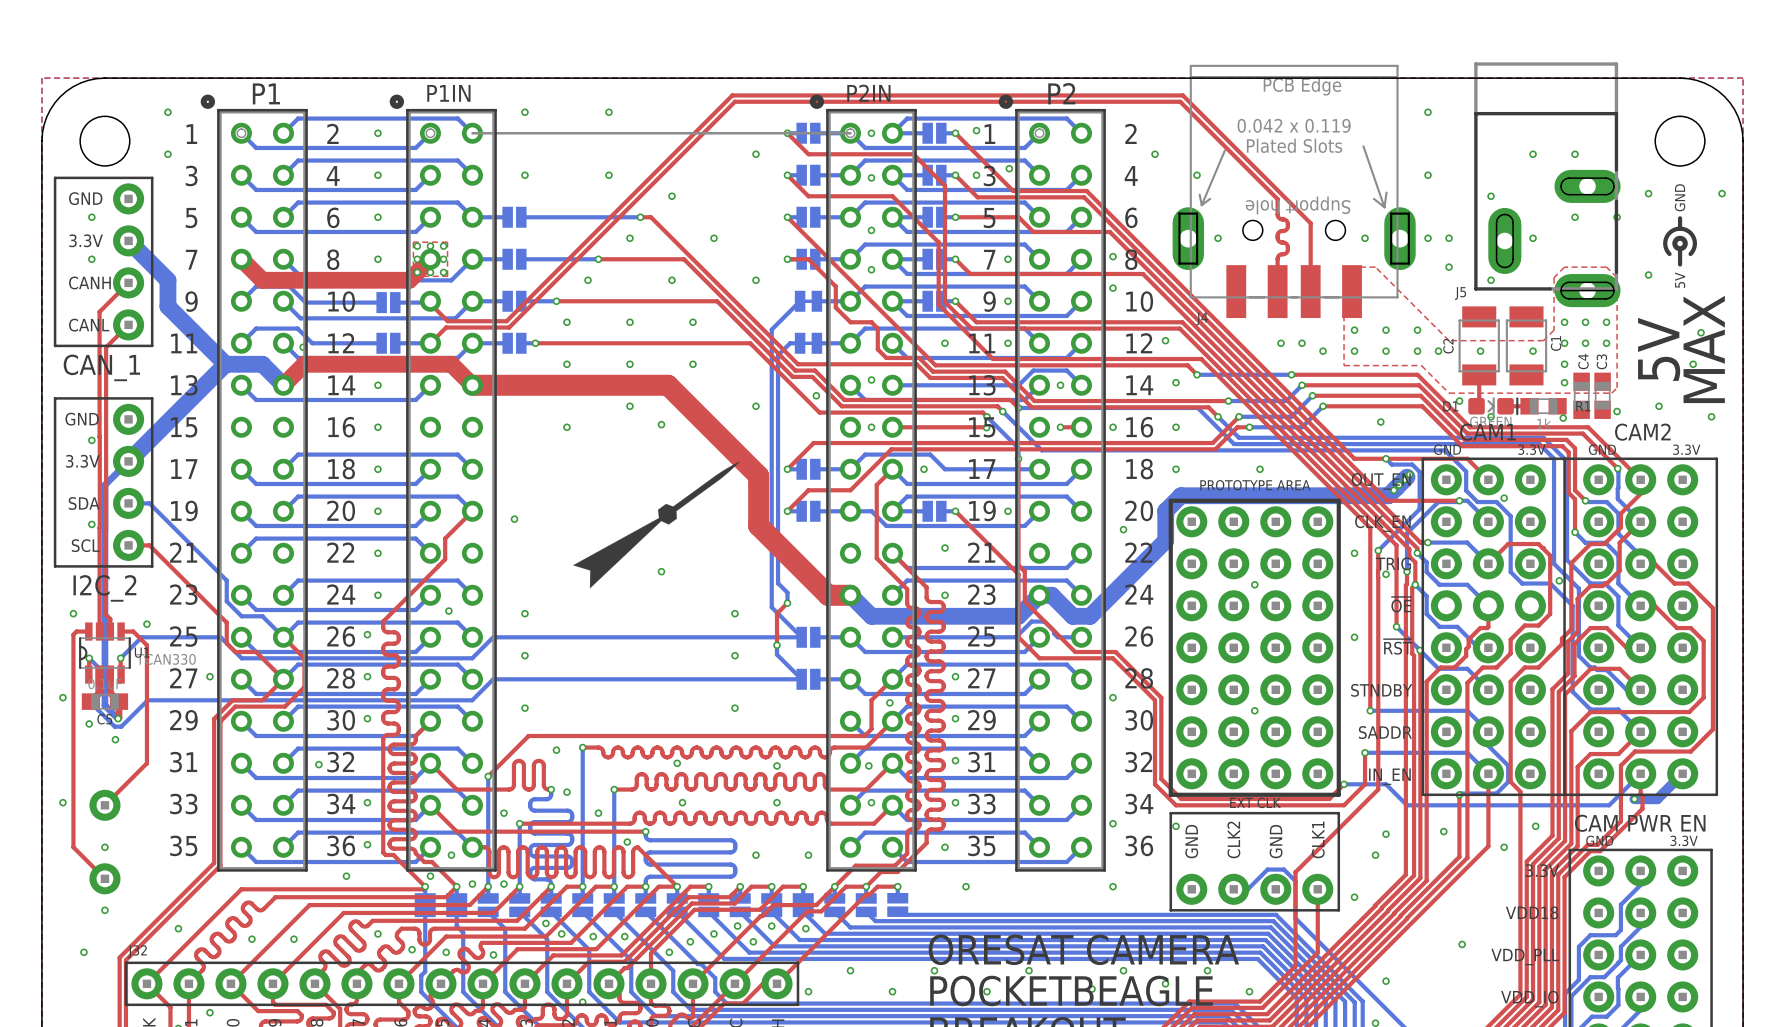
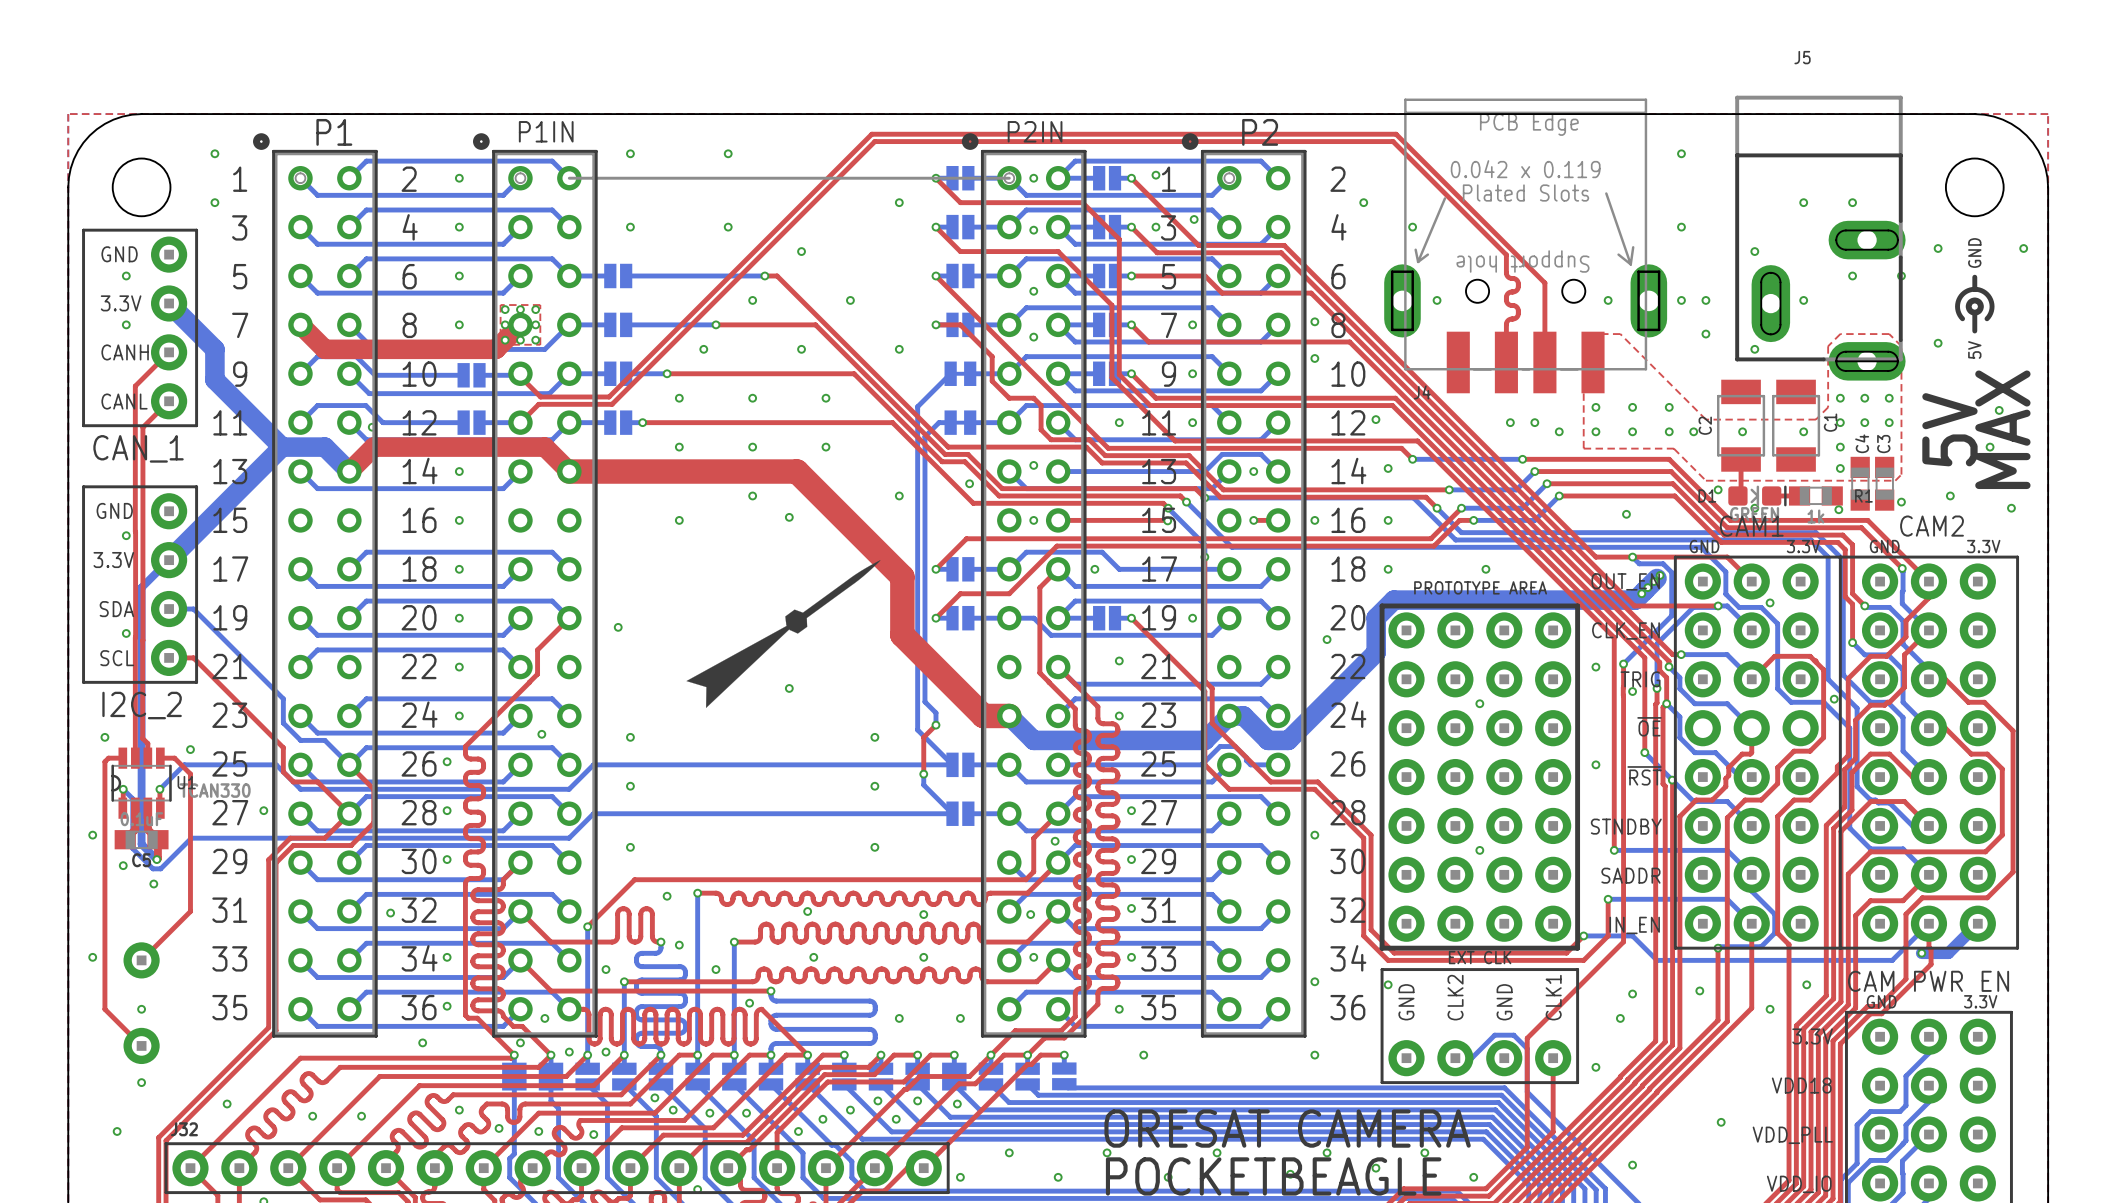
J5 name position: J5 (1460, 293) -> J5 (1802, 57)

